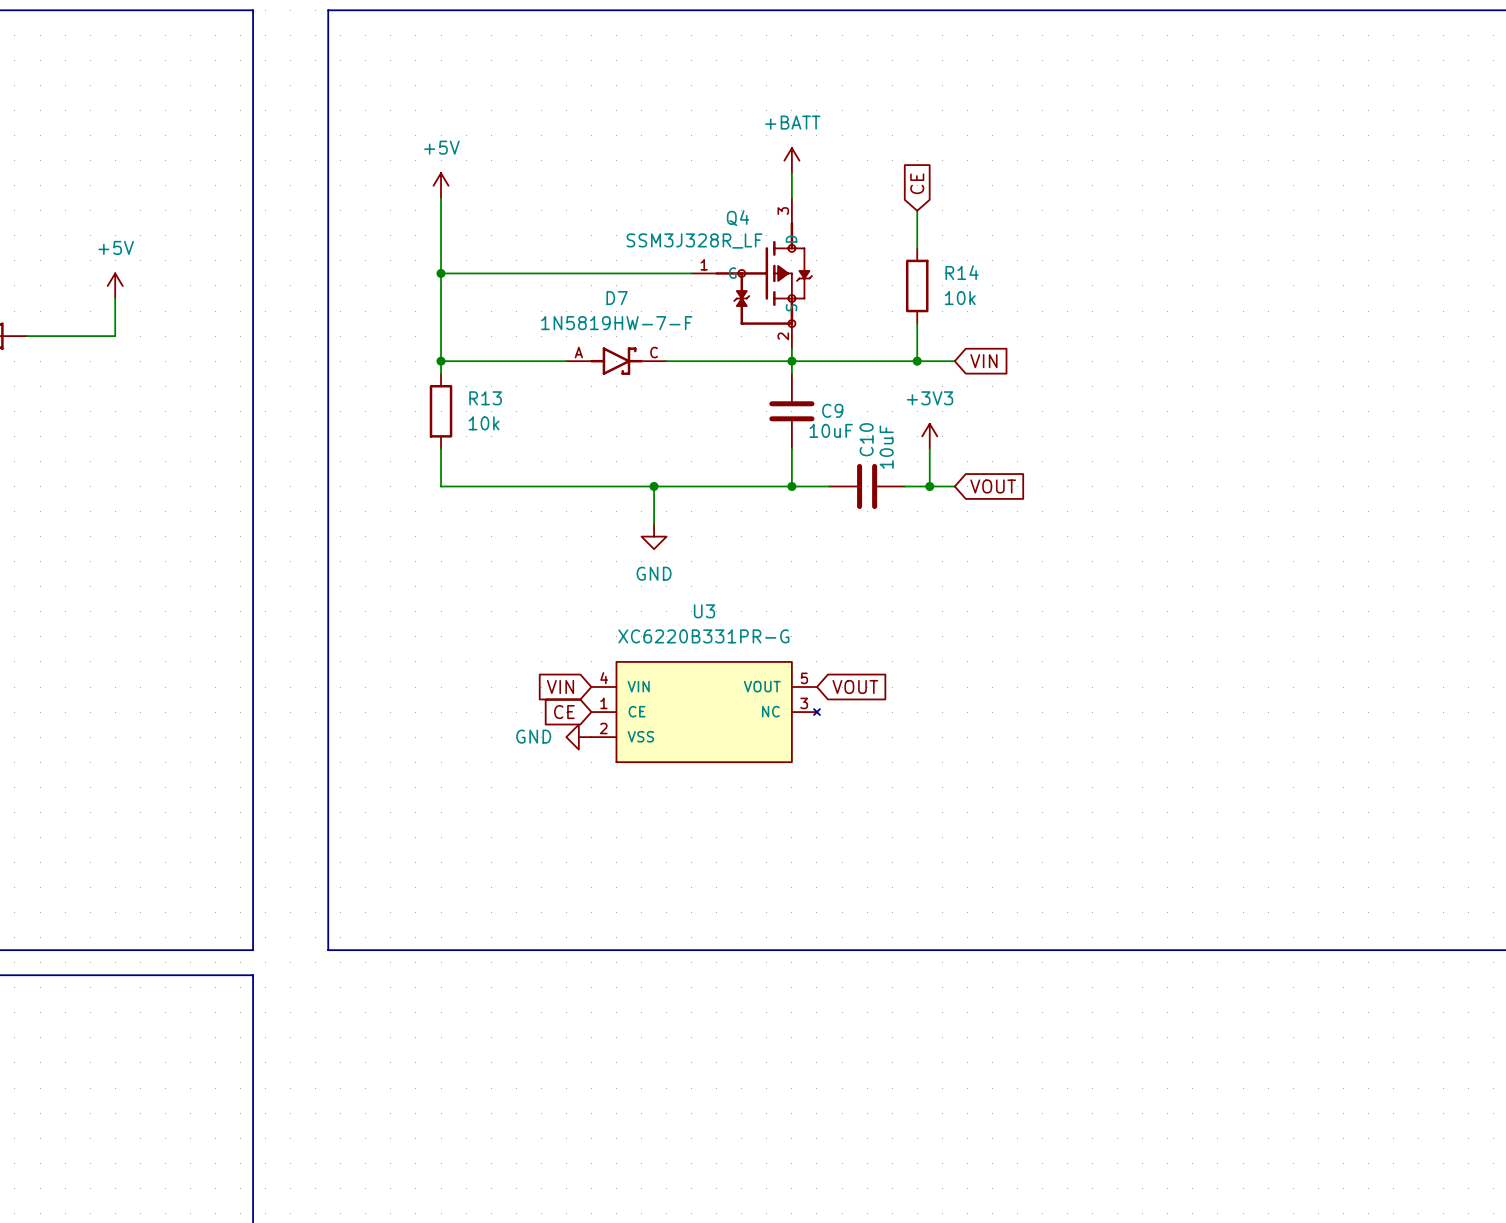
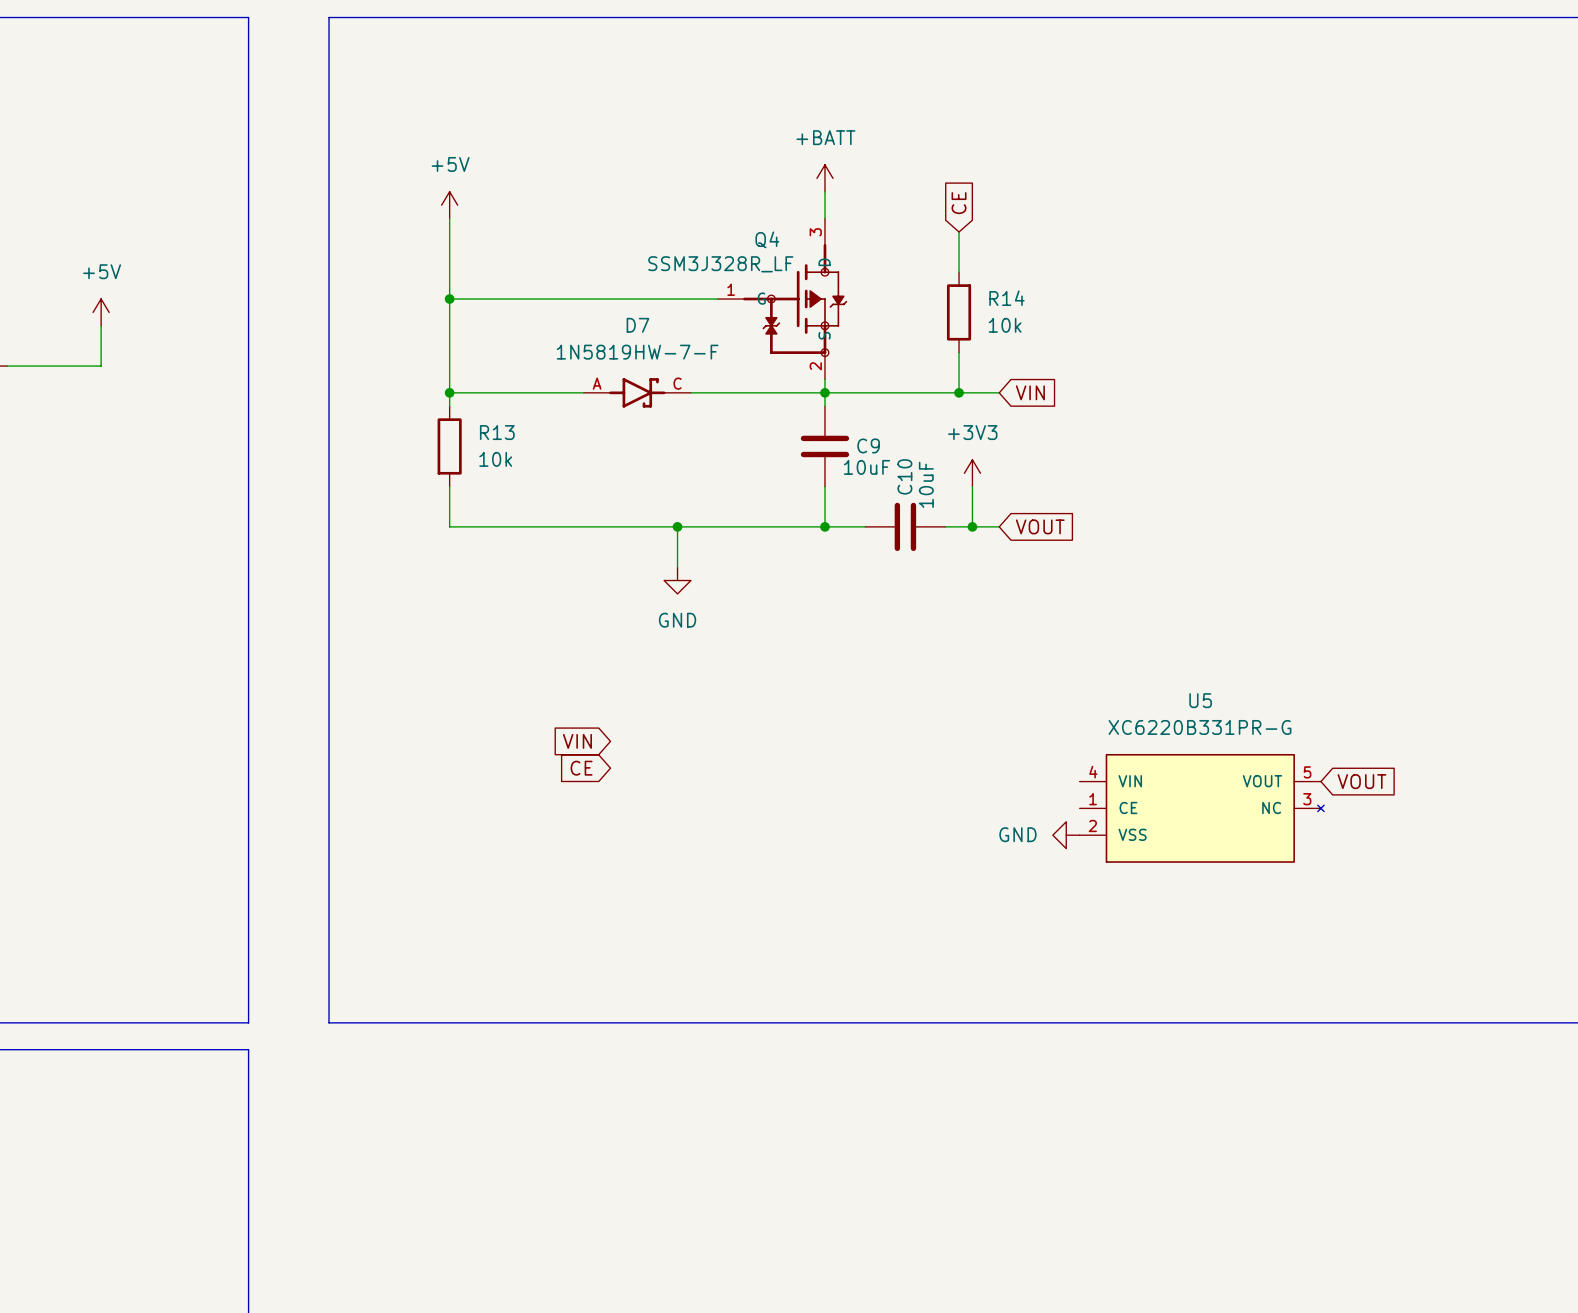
global label: VOUT (855, 687) -> none
U3: XC6220B331PR-G (705, 712) -> none
global label: none -> VOUT (1361, 781)
power symbol: GND (578, 737) -> none
U5: none -> XC6220B331PR-G (1201, 808)
power symbol: none -> GND (1066, 835)

